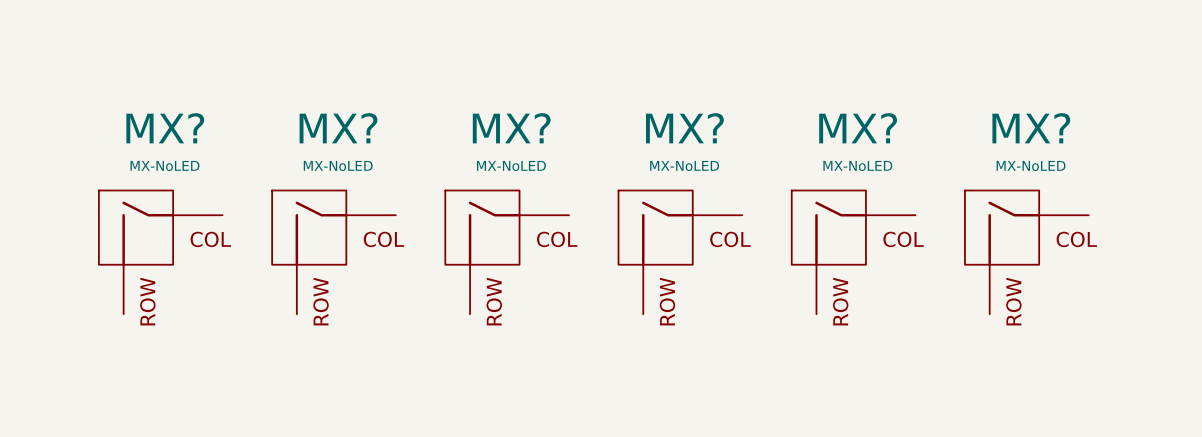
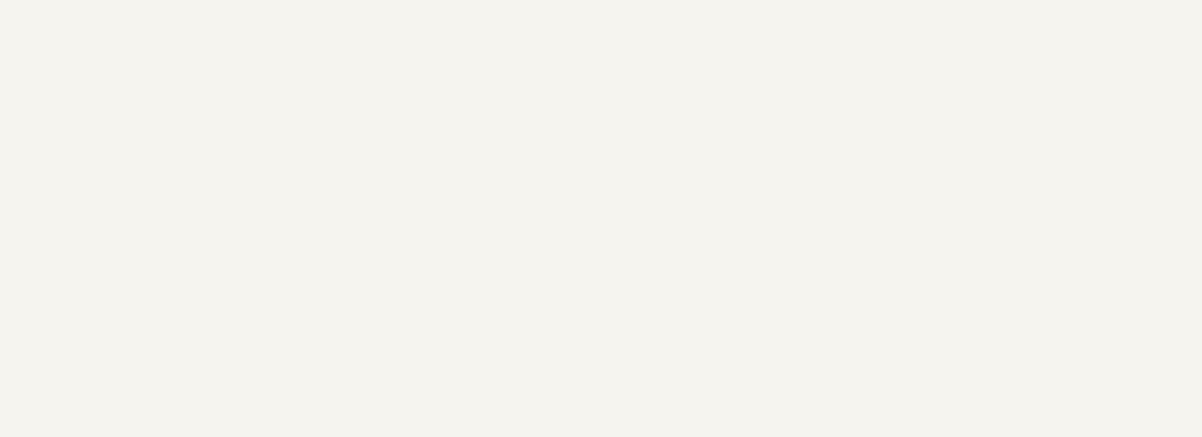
MX?: MX-NoLED (160, 252) -> none
MX?: MX-NoLED (333, 252) -> none
MX?: MX-NoLED (507, 252) -> none
MX?: MX-NoLED (680, 252) -> none
MX?: MX-NoLED (853, 252) -> none
MX?: MX-NoLED (1026, 252) -> none

